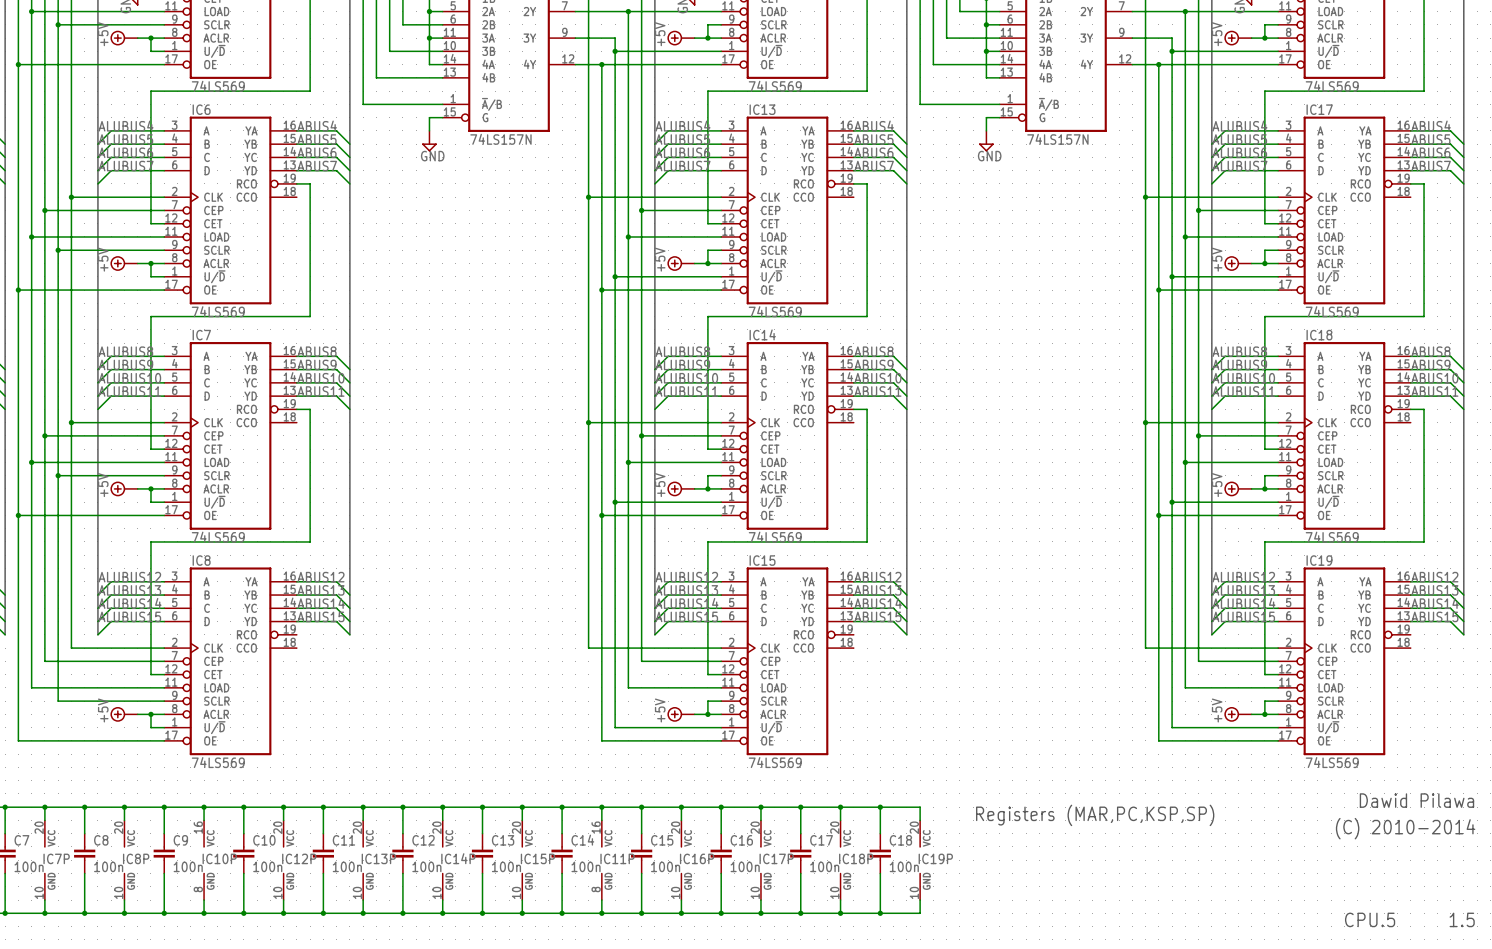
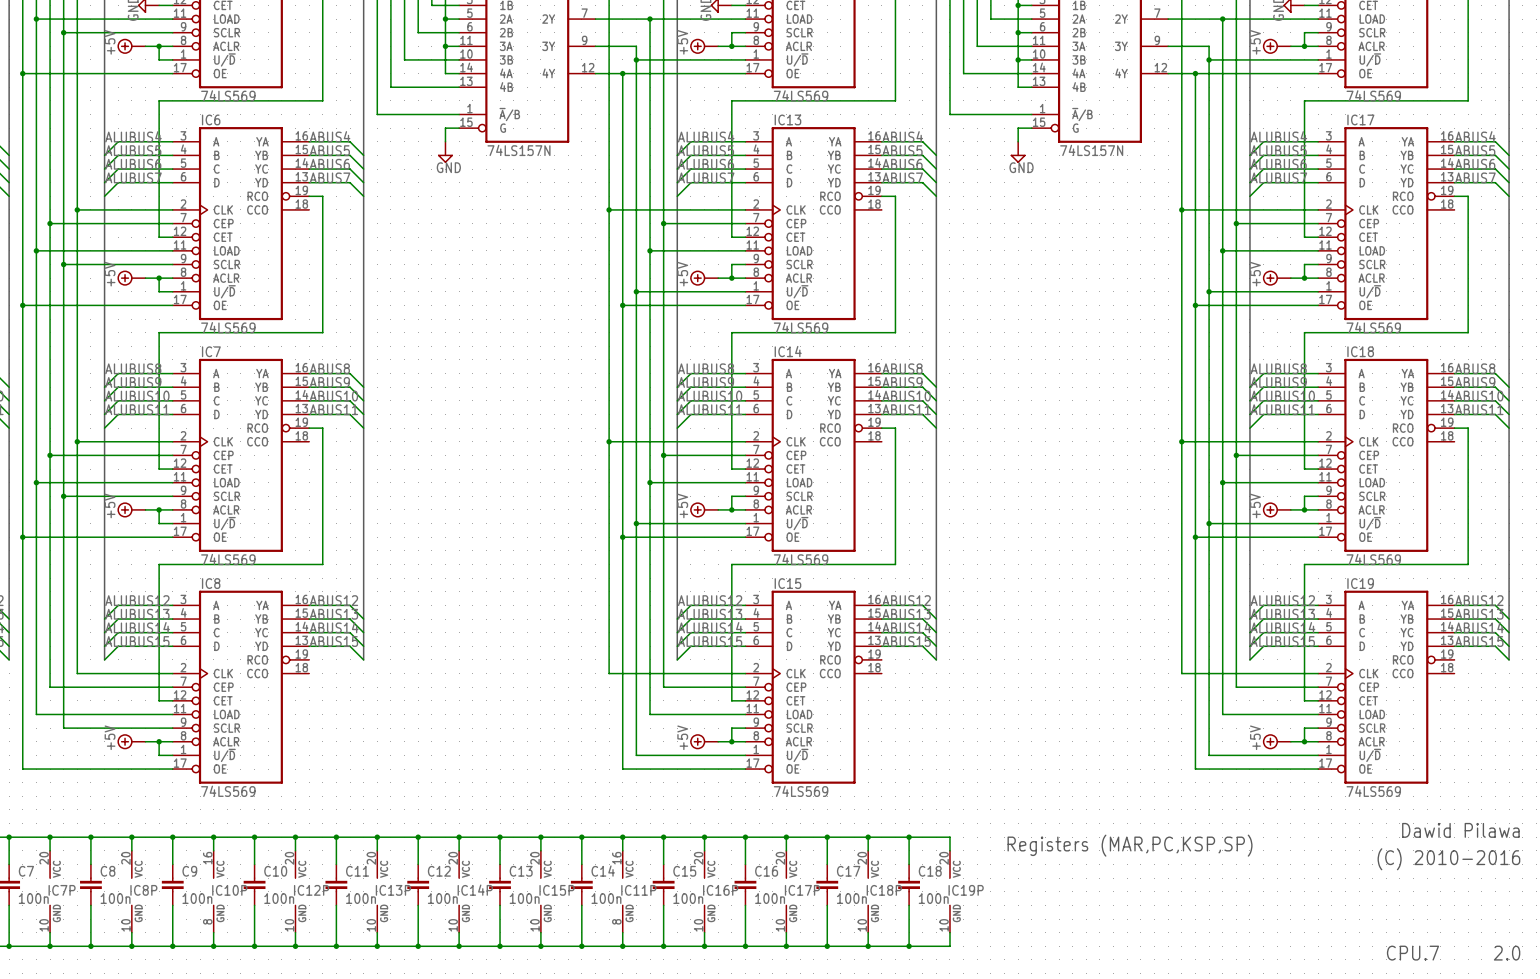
text: (C) 2010-2014 (1405, 828) -> (C) 2010-2016 (1448, 859)
text: CPU.5 (1370, 919) -> CPU.7 (1412, 953)
text: 1.5 (1462, 919) -> 2.0 (1507, 953)

